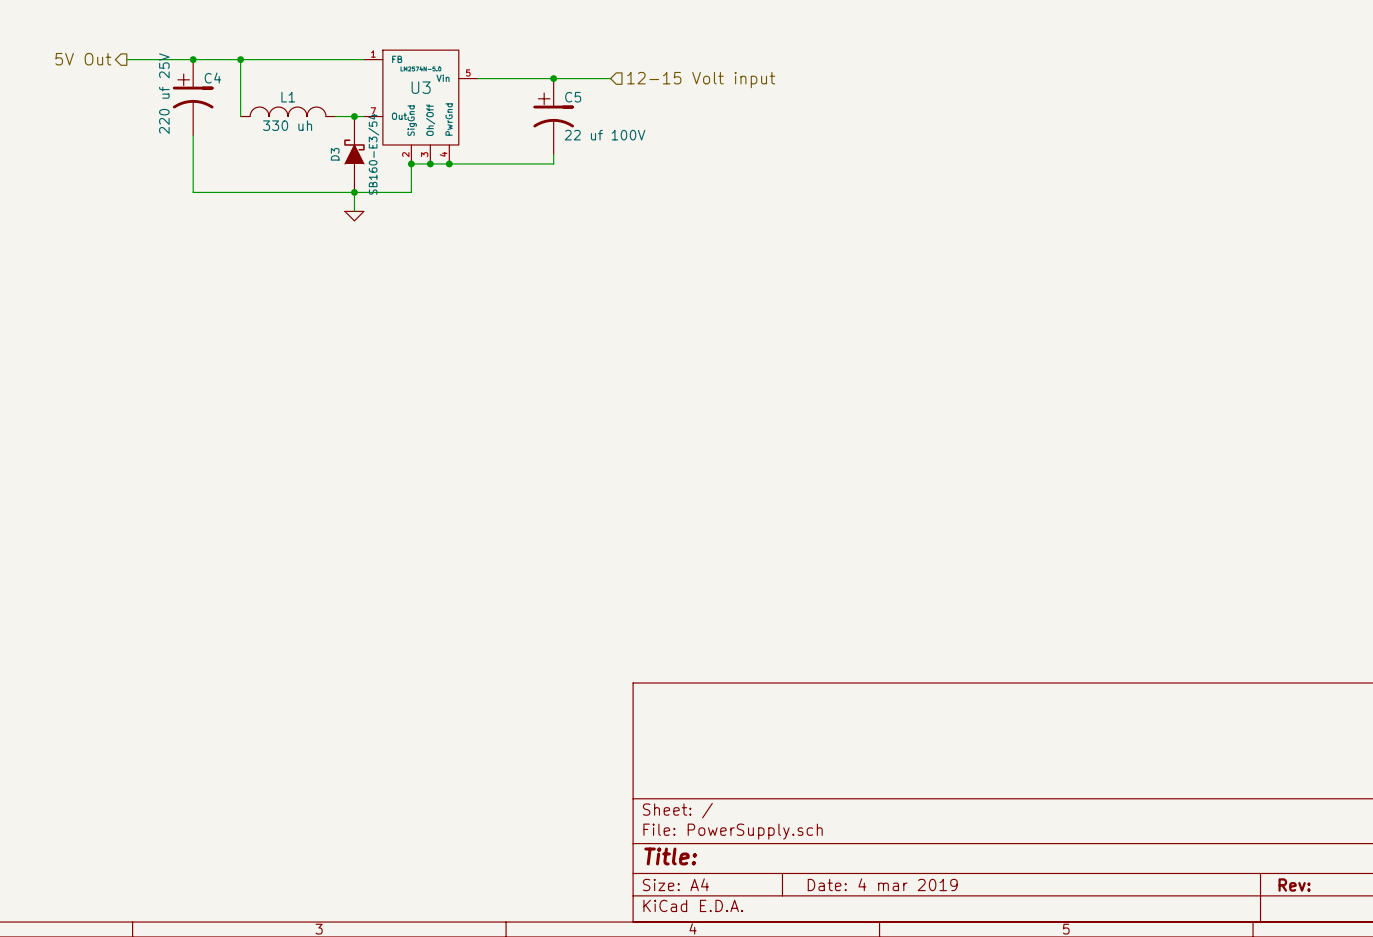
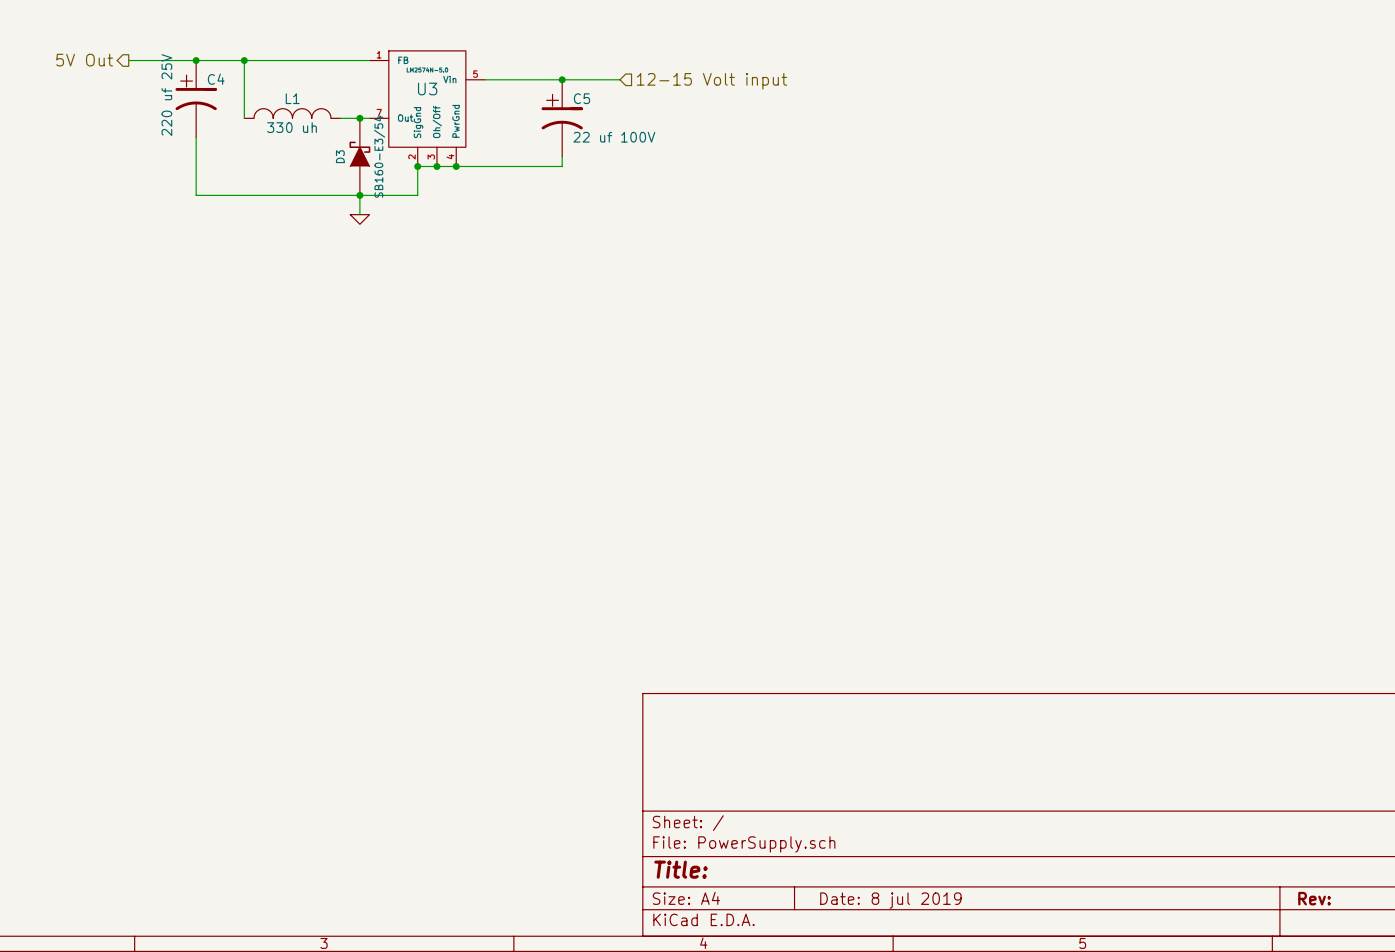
title block: Date: 4 mar 2019 (882, 884) -> Date: 8 jul 2019 (890, 900)

